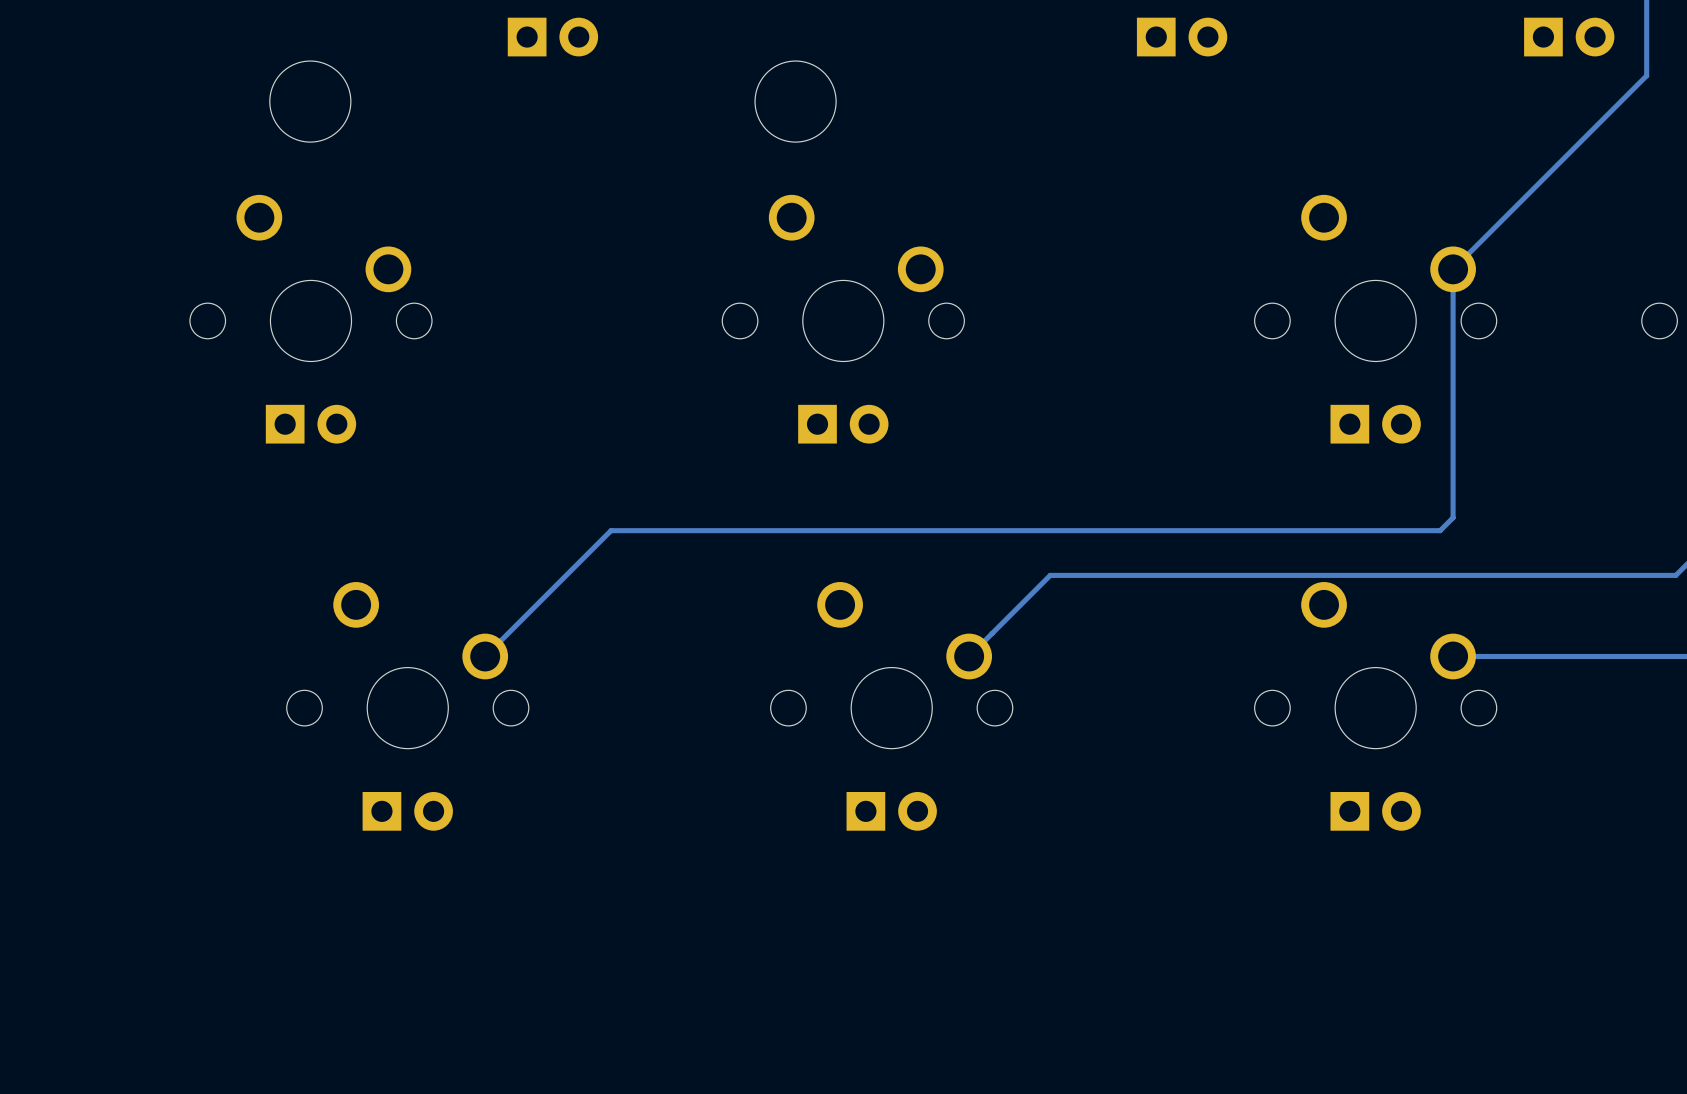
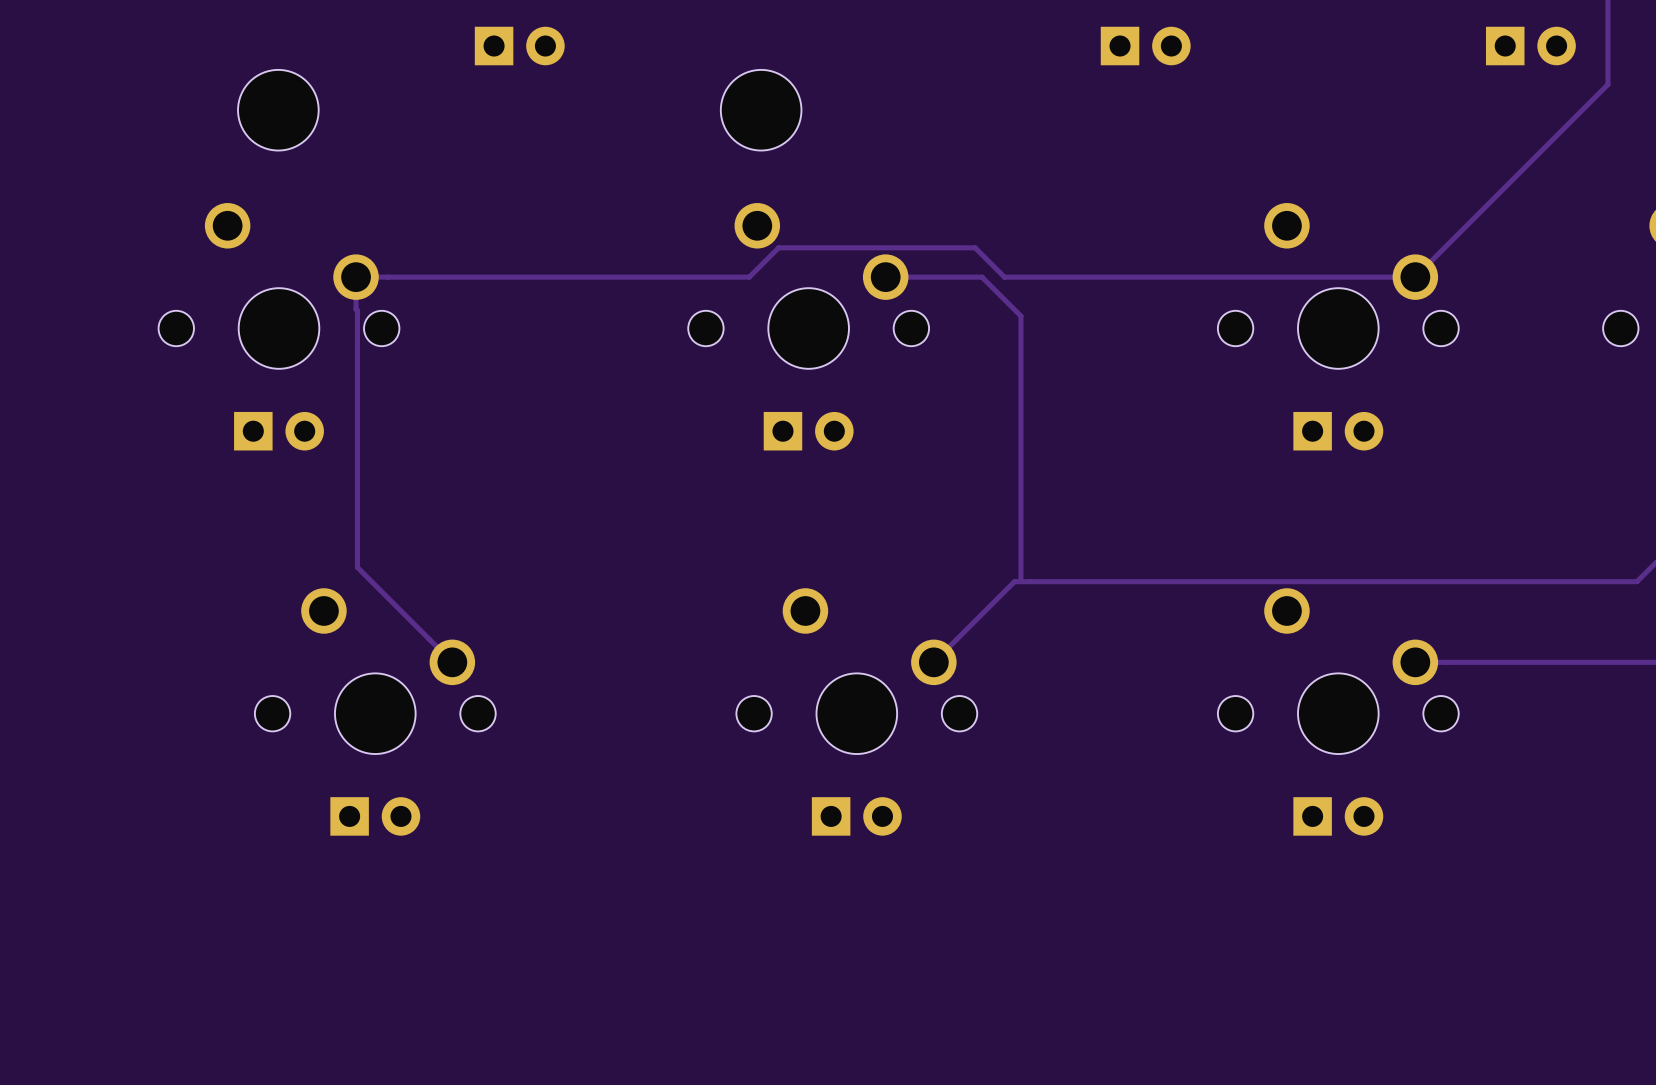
track: none -> (885, 277) (982, 277) (1020, 316) (1020, 581)
track: (1453, 269) (1453, 517) (1440, 530) (611, 530) (485, 656) -> (1415, 277) (1004, 277) (975, 247) (778, 247) (749, 277) (356, 277) (357, 567) (452, 662)

